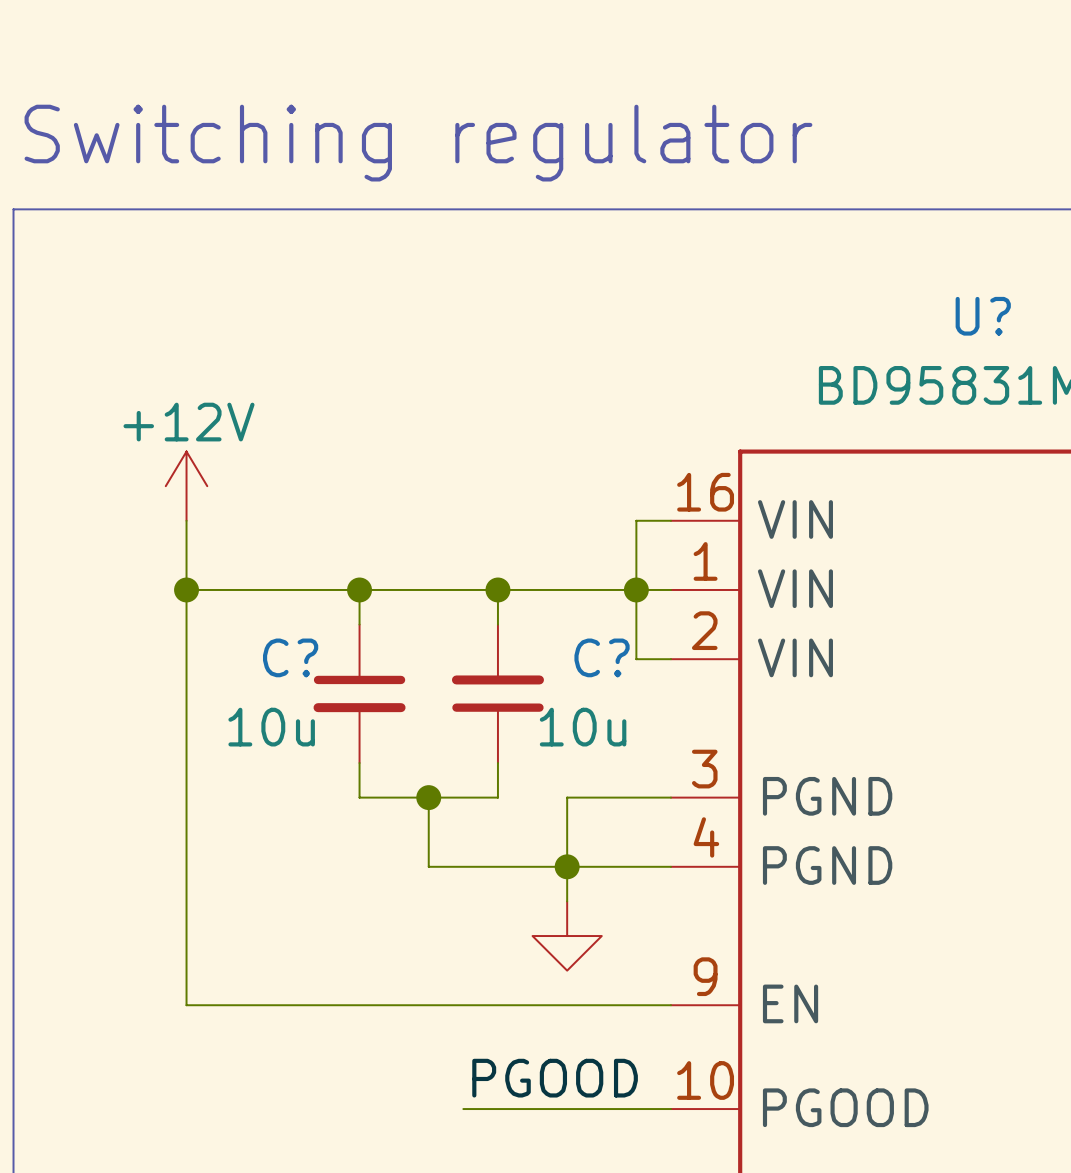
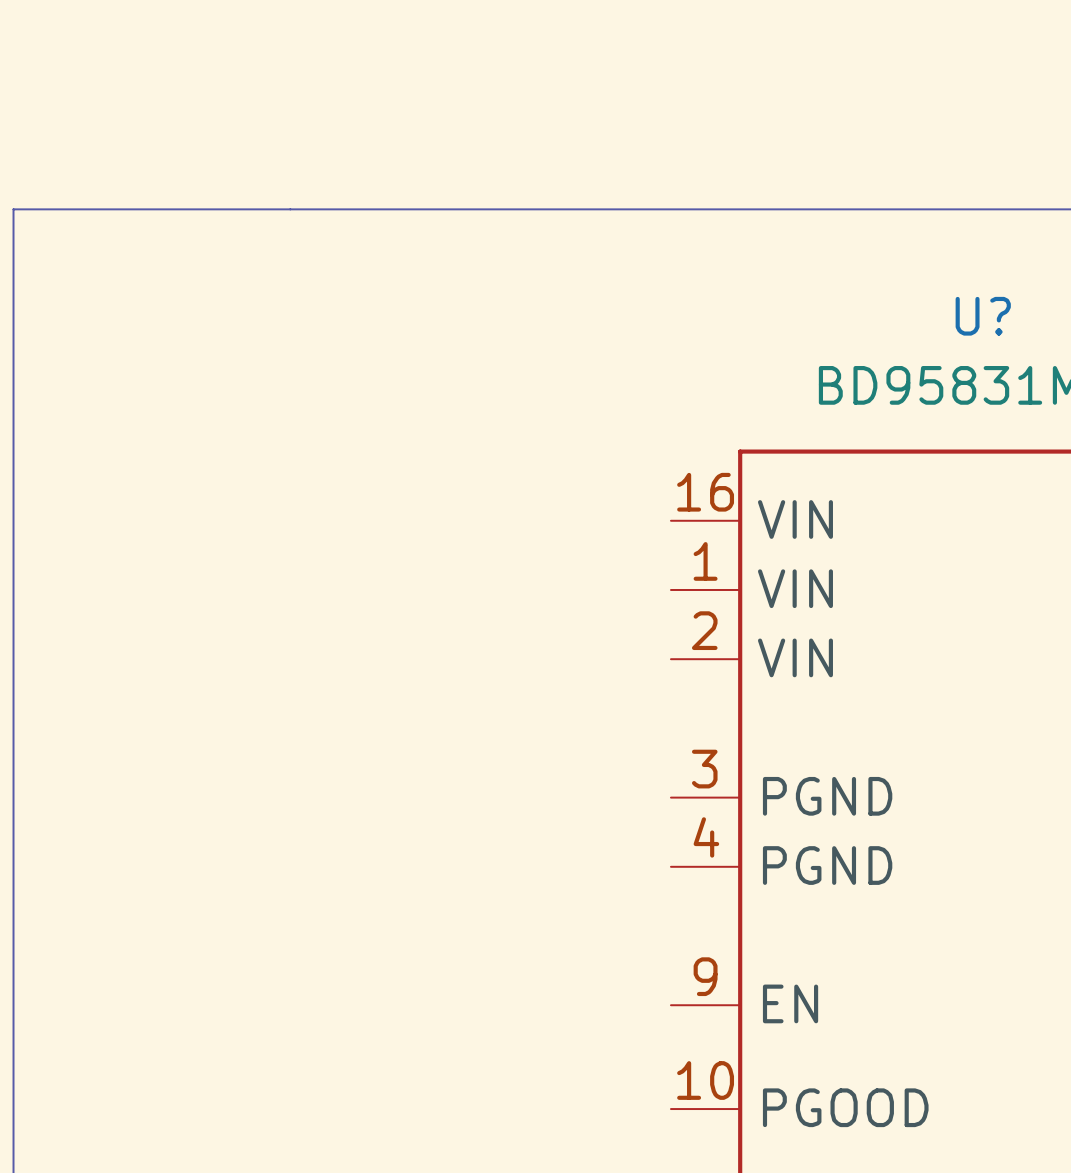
text: Switching regulator (418, 143) -> none
power symbol: +12V (186, 486) -> none
wire: (186, 520) (186, 1005) (670, 1005) -> none
wire: (670, 520) (636, 520) (636, 659) (670, 659) -> none
wire: (186, 589) (670, 589) -> none
junction: (186, 589) -> none
wire: (359, 589) (359, 624) -> none
junction: (359, 589) -> none
wire: (497, 589) (497, 624) -> none
junction: (497, 589) -> none
junction: (636, 589) -> none
C?: 10u (359, 693) -> none
C?: 10u (497, 693) -> none
wire: (359, 763) (359, 797) (497, 797) (497, 763) -> none
wire: (428, 797) (428, 866) (670, 866) -> none
junction: (428, 797) -> none
wire: (670, 797) (567, 797) (567, 901) -> none
junction: (567, 866) -> none
power symbol: (567, 936) -> none
label: PGOOD (555, 1078) -> none
wire: (463, 1109) (670, 1109) -> none

